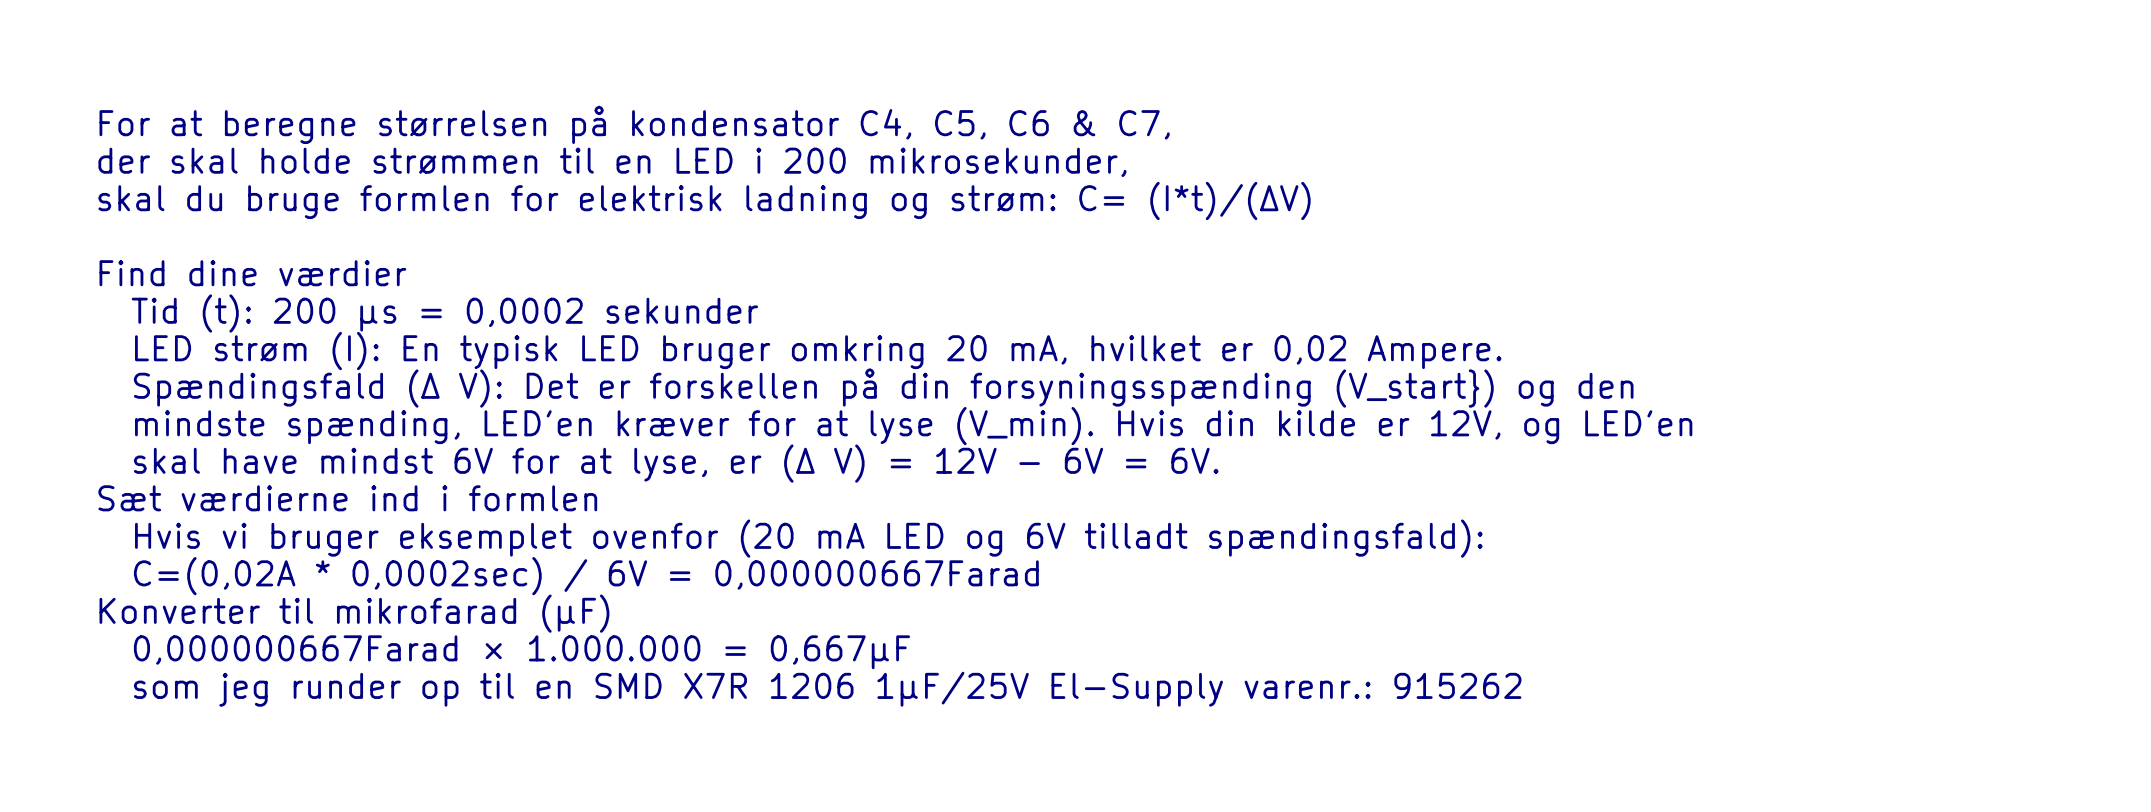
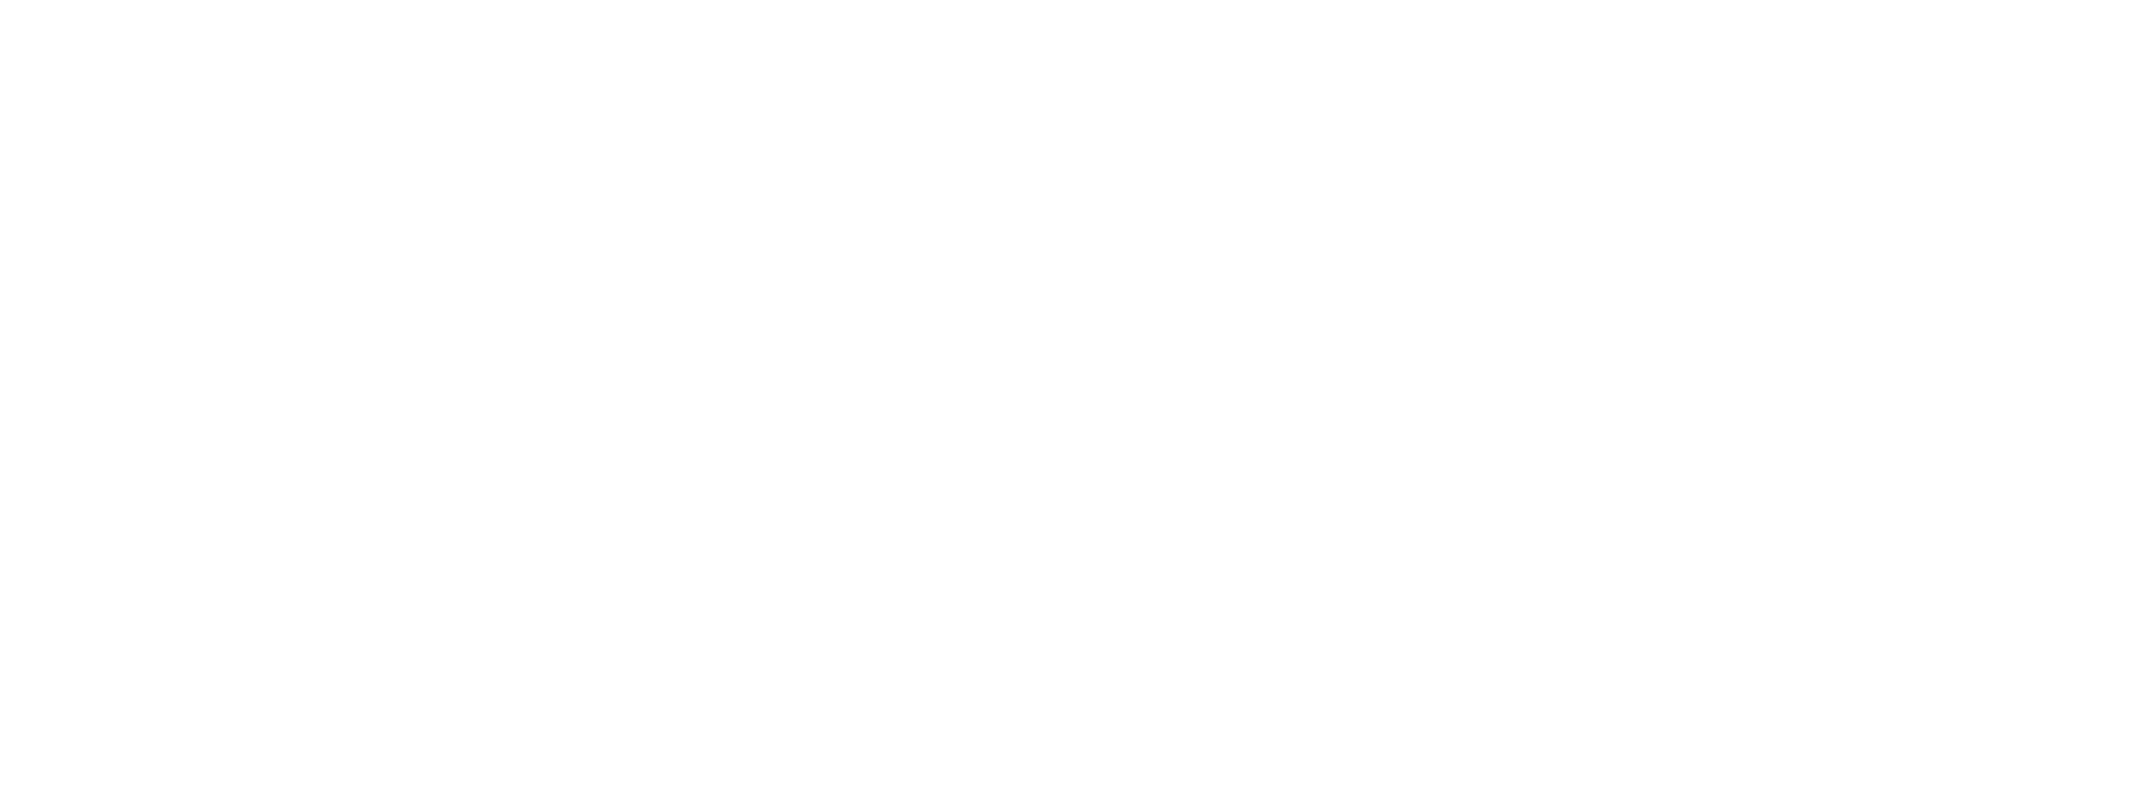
text: For at beregne størrelsen på kondensator C4, C5, C6 & C7, (634, 124) -> none
text: der skal holde strømmen til en LED i 200 mikrosekunder, (612, 162) -> none
text: skal du bruge formlen for elektrisk ladning og strøm: C= (I*t)/(ΔV) (704, 200) -> none
text: Find dine værdier (252, 273) -> none
text: Tid (t): 200 µs = 0,0002 sekunder (444, 313) -> none
text: LED strøm (I): En typisk LED bruger omkring 20 mA, hvilket er 0,02 Ampere. (818, 351) -> none
text: Spændingsfald (Δ V): Det er forskellen på din forsyningsspænding (V_start}) og den (883, 387) -> none
text: mindste spænding, LED'en kræver for at lyse (V_min). Hvis din kilde er 12V, og LED'en (913, 426) -> none
text: skal have mindst 6V for at lyse, er (Δ V) = 12V - 6V = 6V. (676, 463) -> none
text: Sæt værdierne ind i formlen (347, 498) -> none
text: Hvis vi bruger eksemplet ovenfor (20 mA LED og 6V tilladt spændingsfald): (808, 538) -> none
text: C=(0,02A * 0,0002sec) / 6V = 0,000000667Farad (586, 576) -> none
text: Konverter til mikrofarad (µF) (354, 613) -> none
text: 0,000000667Farad × 1.000.000 = 0,667µF (521, 652) -> none
text: som jeg runder op til en SMD X7R 1206 1µF/25V El-Supply varenr.: 915262 (827, 689) -> none

